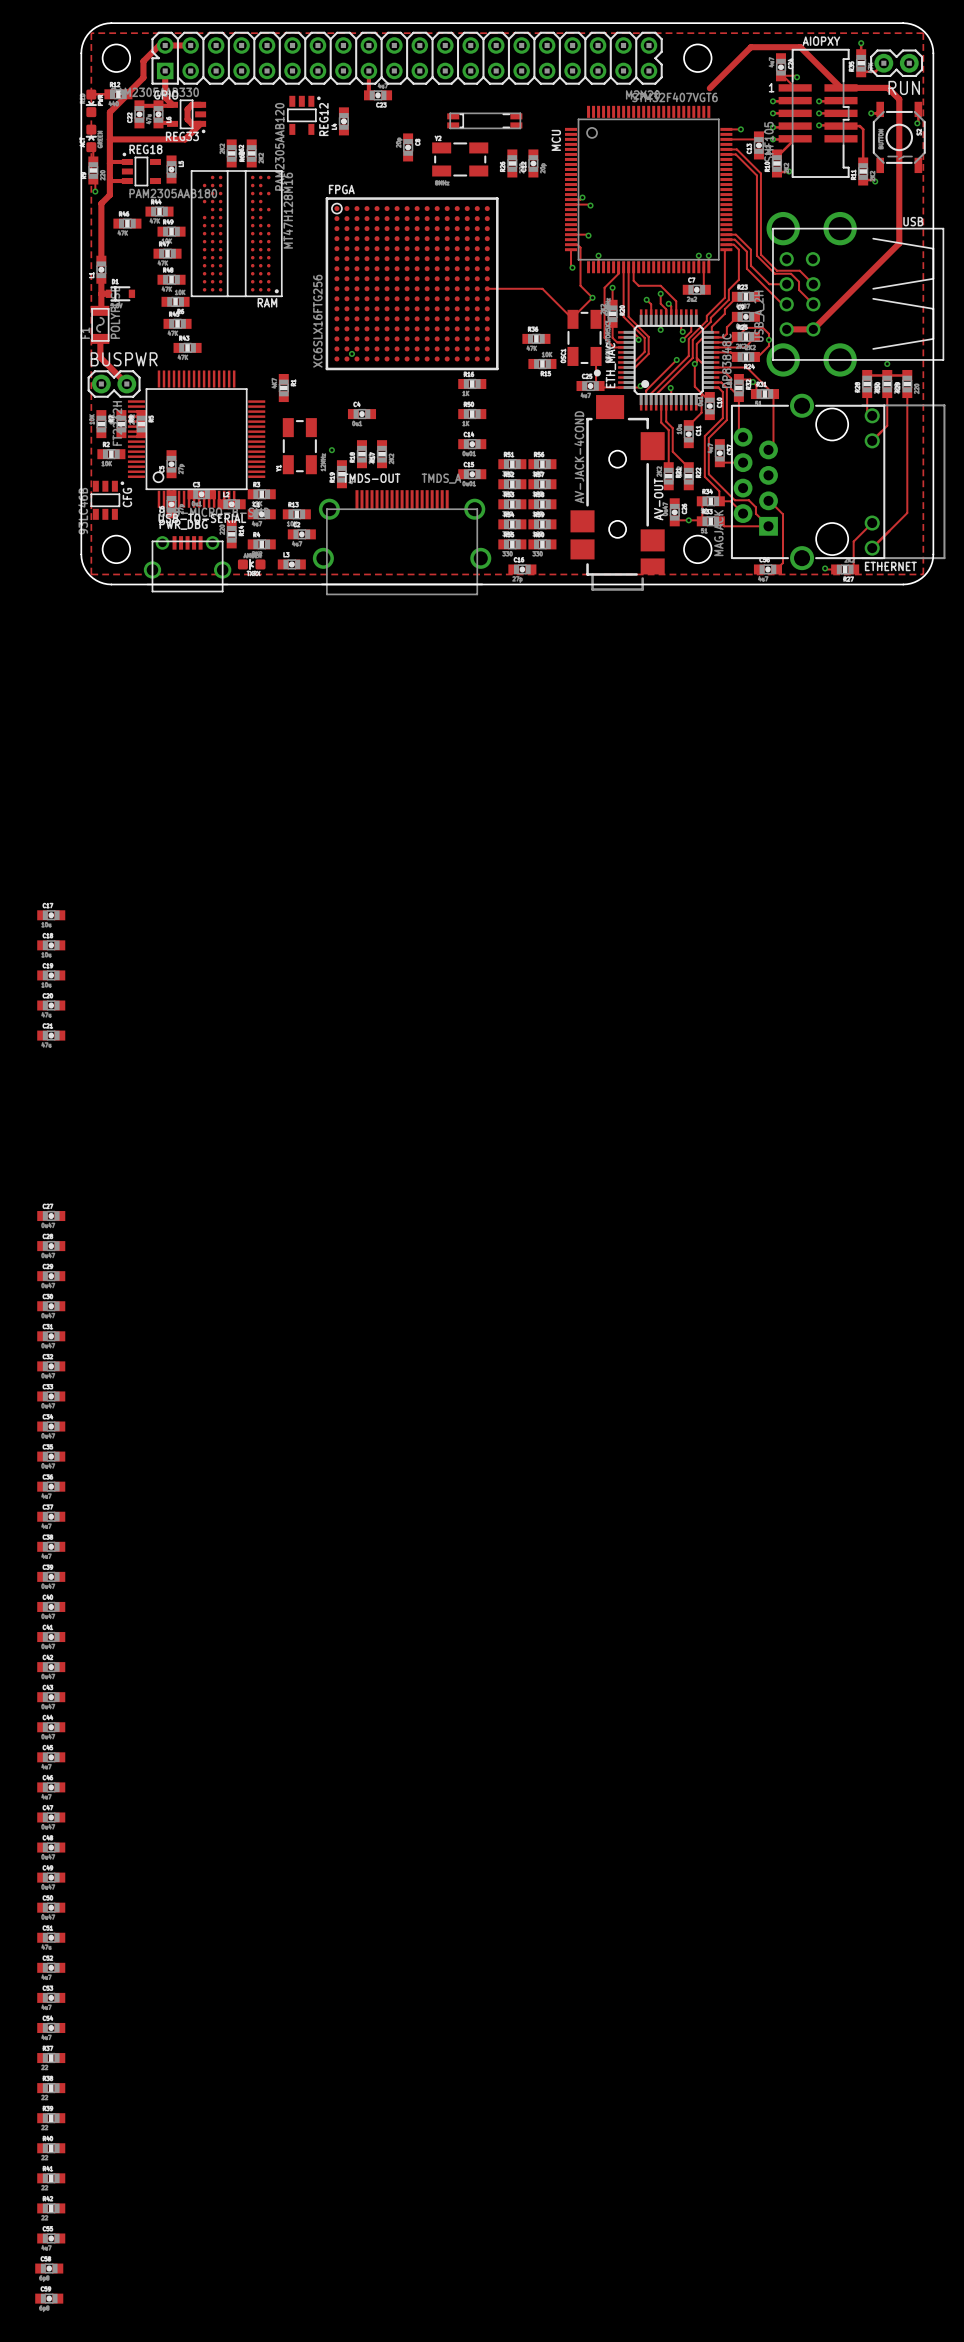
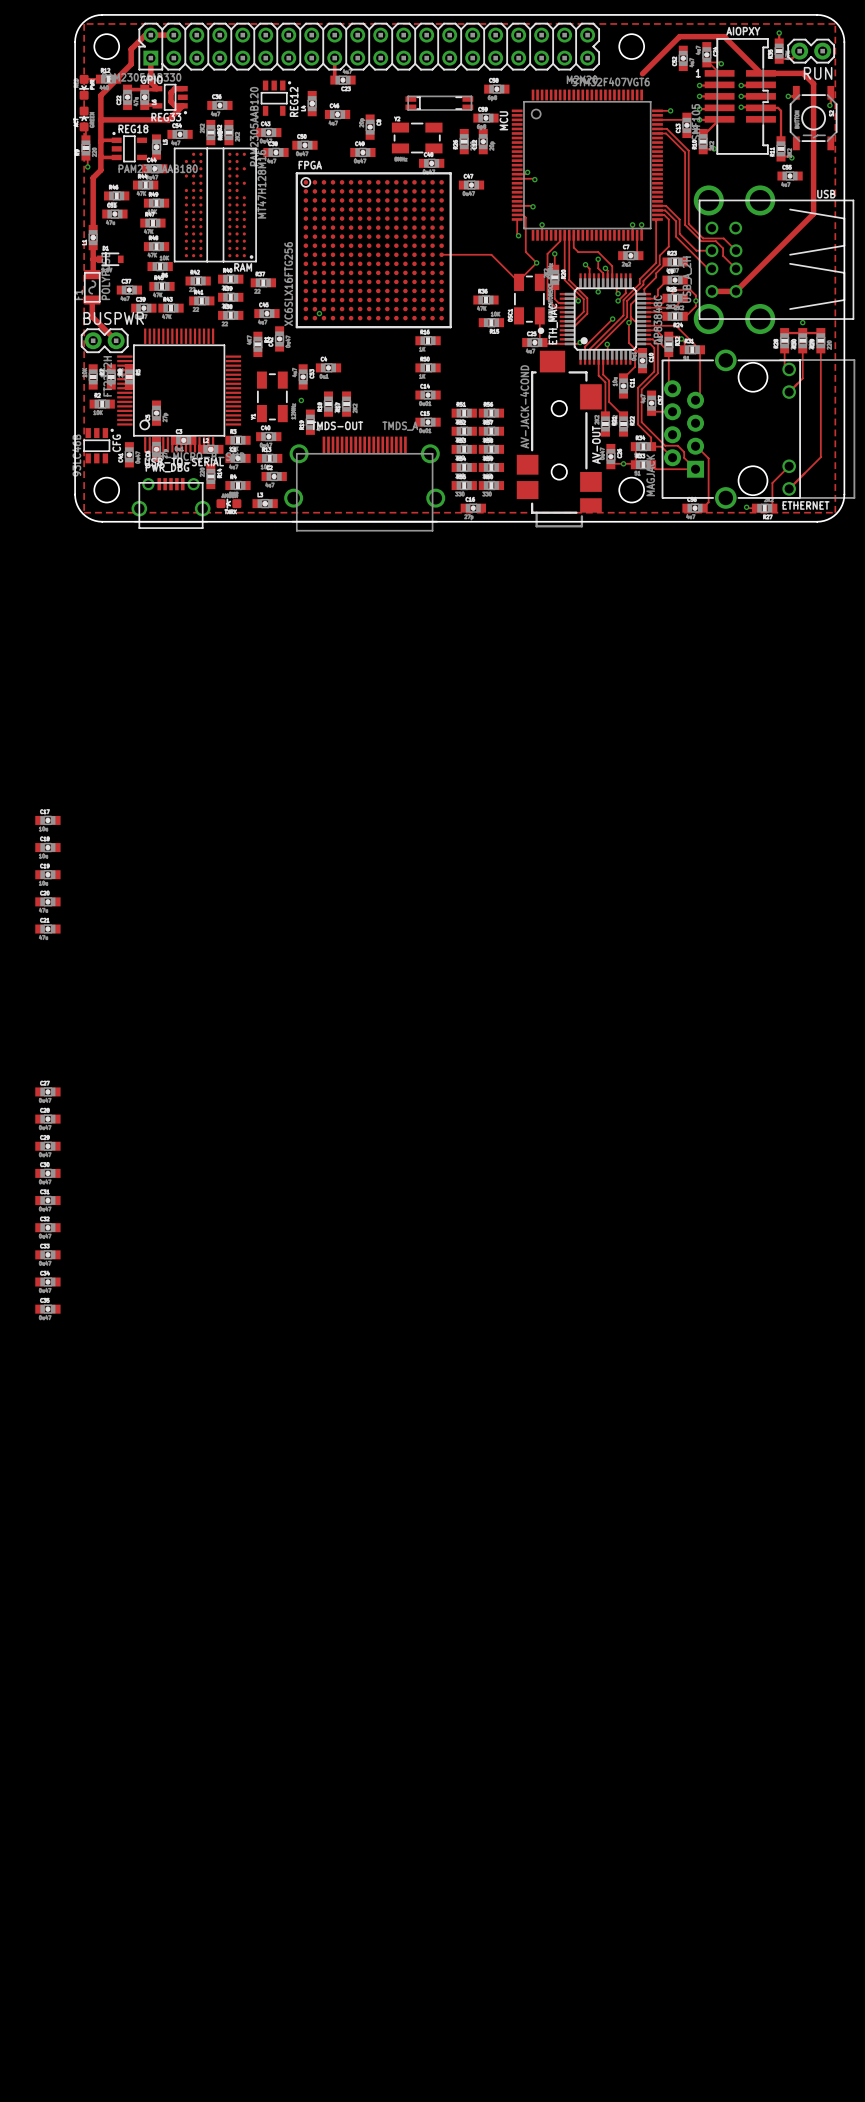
part position: (51, 1486) -> (219, 105)
part position: (51, 1516) -> (129, 290)
part position: (51, 1546) -> (275, 152)
part position: (51, 1576) -> (143, 308)
part position: (51, 1606) -> (268, 436)
part rotation: 0° (51, 1637) -> 90° clockwise (129, 454)
part position: (51, 1637) -> (129, 454)
part rotation: 0° (51, 1667) -> 90° clockwise (279, 338)
part position: (51, 1667) -> (279, 338)
part position: (51, 1697) -> (268, 132)
part position: (51, 1727) -> (154, 168)
part position: (51, 1757) -> (266, 313)
part position: (51, 1787) -> (337, 114)
part position: (51, 1817) -> (471, 185)
part position: (51, 1847) -> (431, 163)
part position: (51, 1877) -> (362, 152)
part position: (51, 1907) -> (304, 145)
part position: (51, 1937) -> (114, 214)
part rotation: 0° (51, 1967) -> 90° clockwise (683, 58)
part position: (51, 1967) -> (683, 58)
part rotation: 0° (51, 1997) -> 90° clockwise (303, 376)
part position: (51, 1997) -> (303, 376)
part position: (51, 2027) -> (180, 134)
part position: (51, 2058) -> (263, 282)
part position: (51, 2088) -> (230, 315)
part position: (51, 2118) -> (230, 297)
part position: (51, 2148) -> (230, 279)
part position: (51, 2178) -> (201, 300)
part position: (51, 2208) -> (198, 281)
part position: (51, 2238) -> (790, 176)
part position: (49, 2268) -> (496, 89)
part position: (49, 2298) -> (485, 118)

